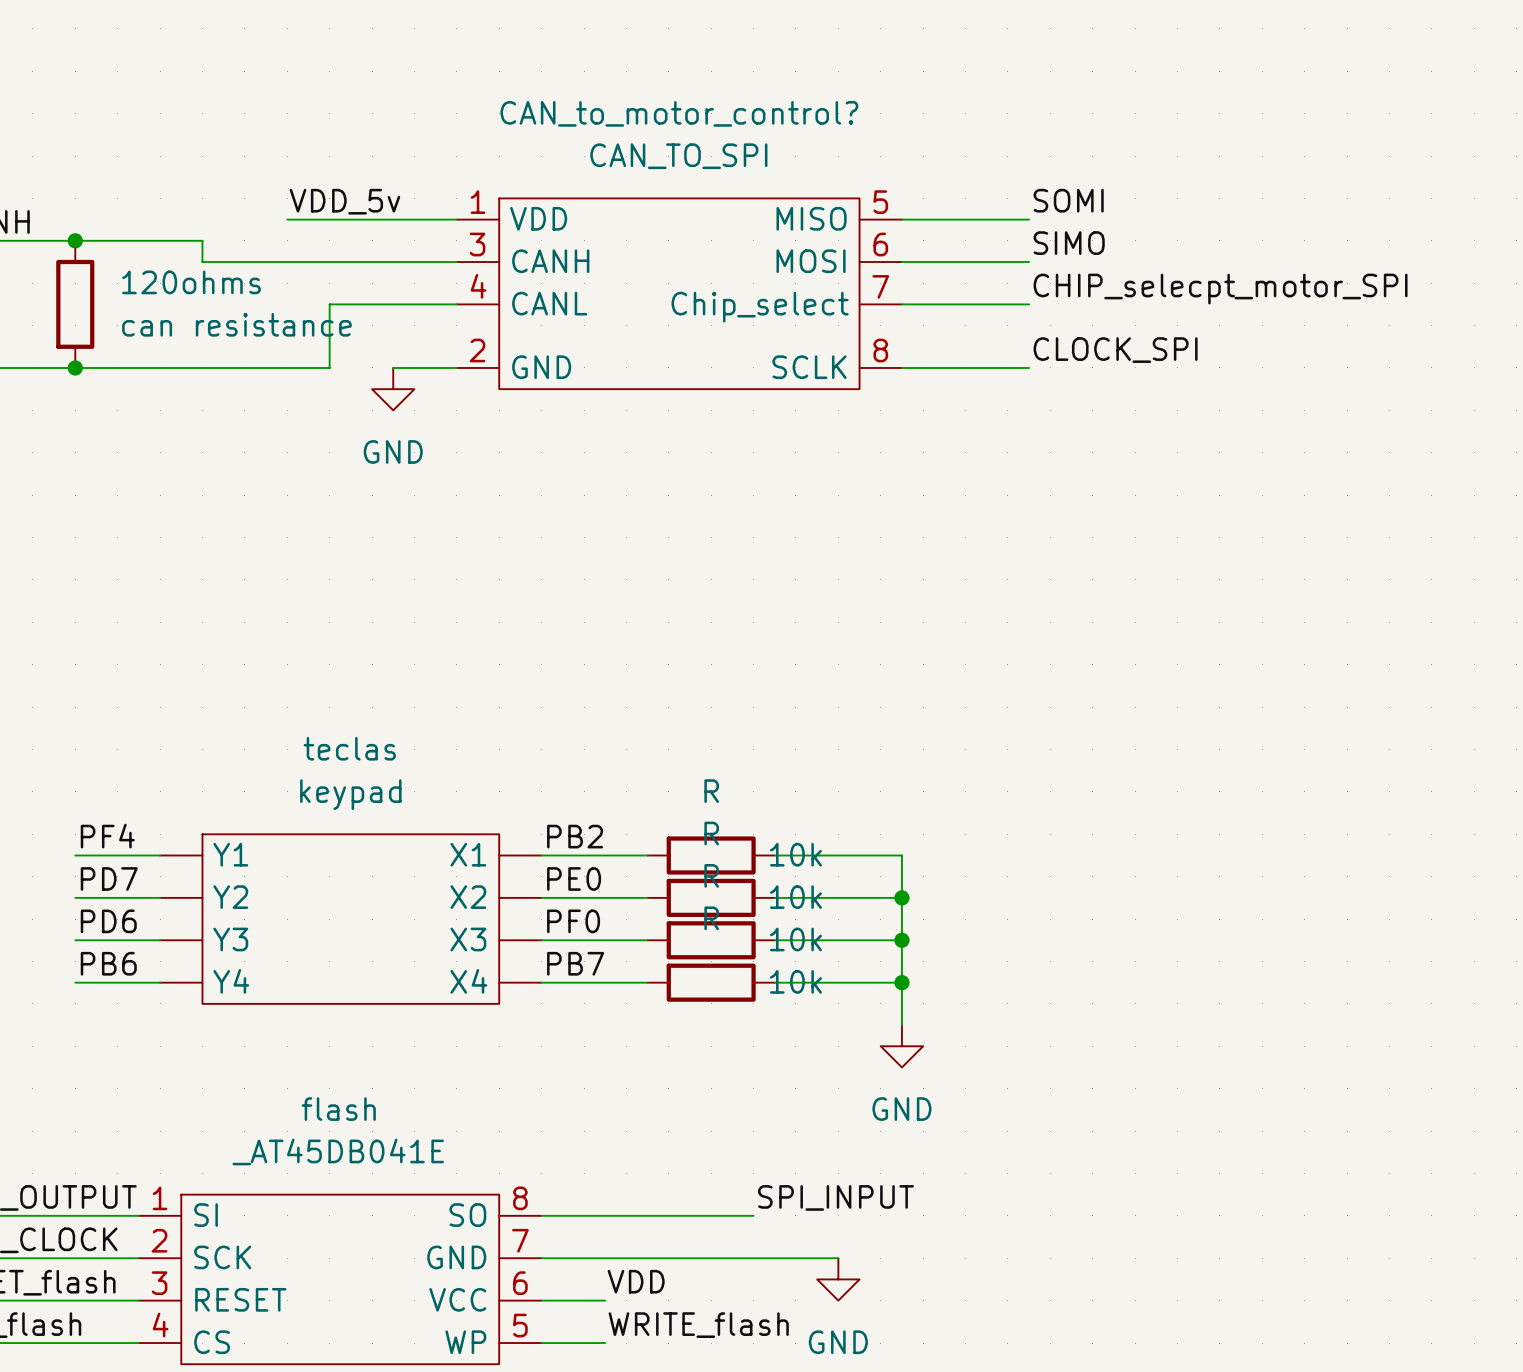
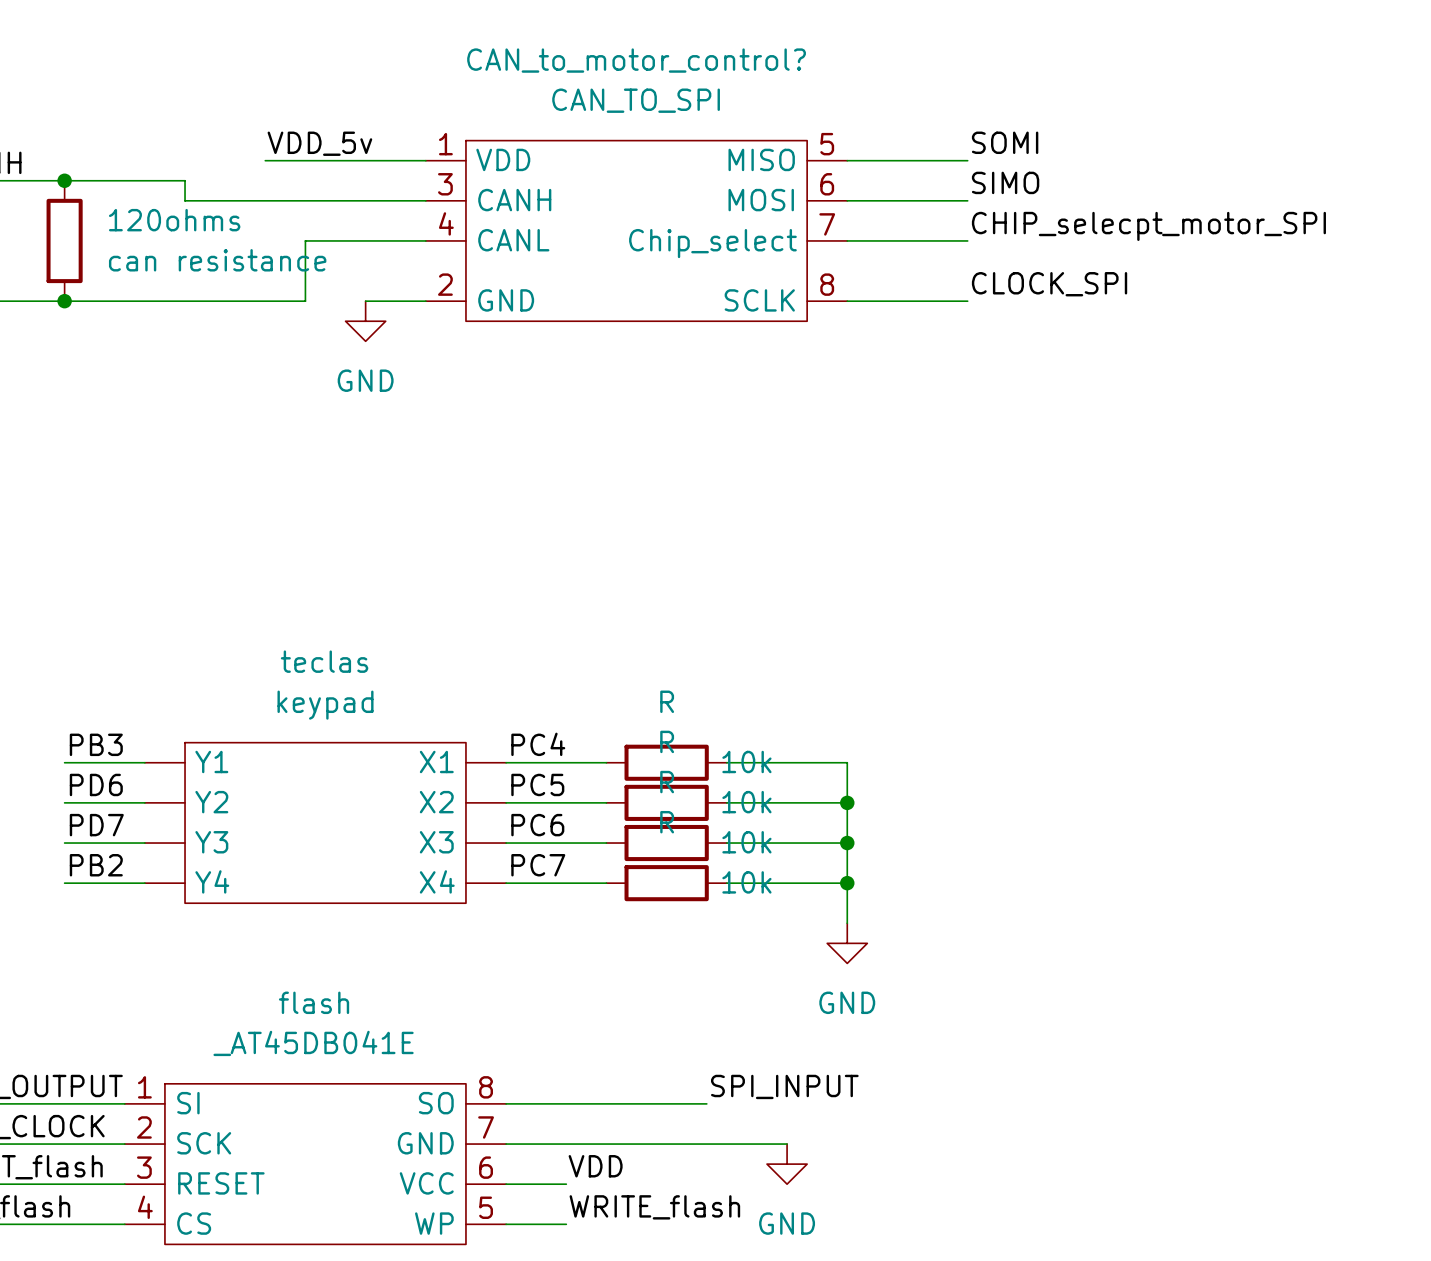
label: PF4 (107, 836) -> PB3 (96, 744)
label: PB2 (575, 836) -> PC4 (538, 744)
label: PD7 (109, 878) -> PD6 (96, 784)
label: PE0 (574, 878) -> PC5 (537, 784)
label: PD6 (108, 921) -> PD7 (96, 825)
label: PF0 (573, 921) -> PC6 (537, 825)
label: PB6 (108, 963) -> PB2 (96, 865)
label: PB7 (575, 963) -> PC7 (538, 865)

